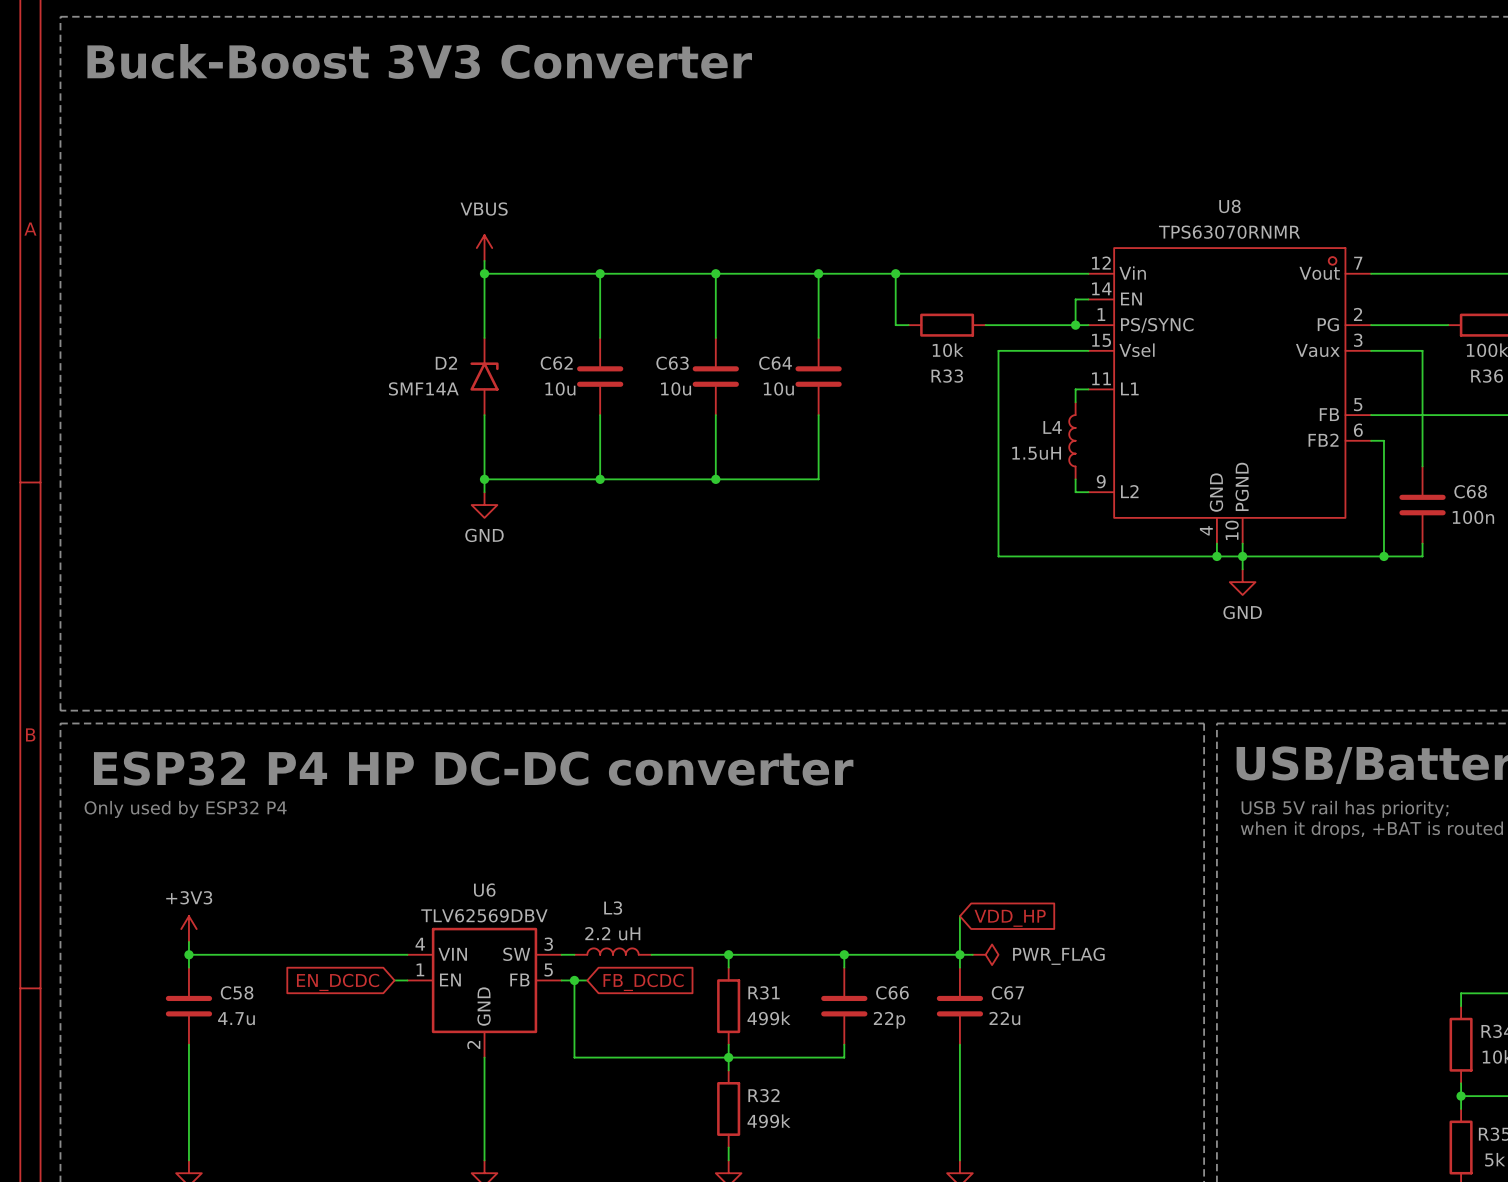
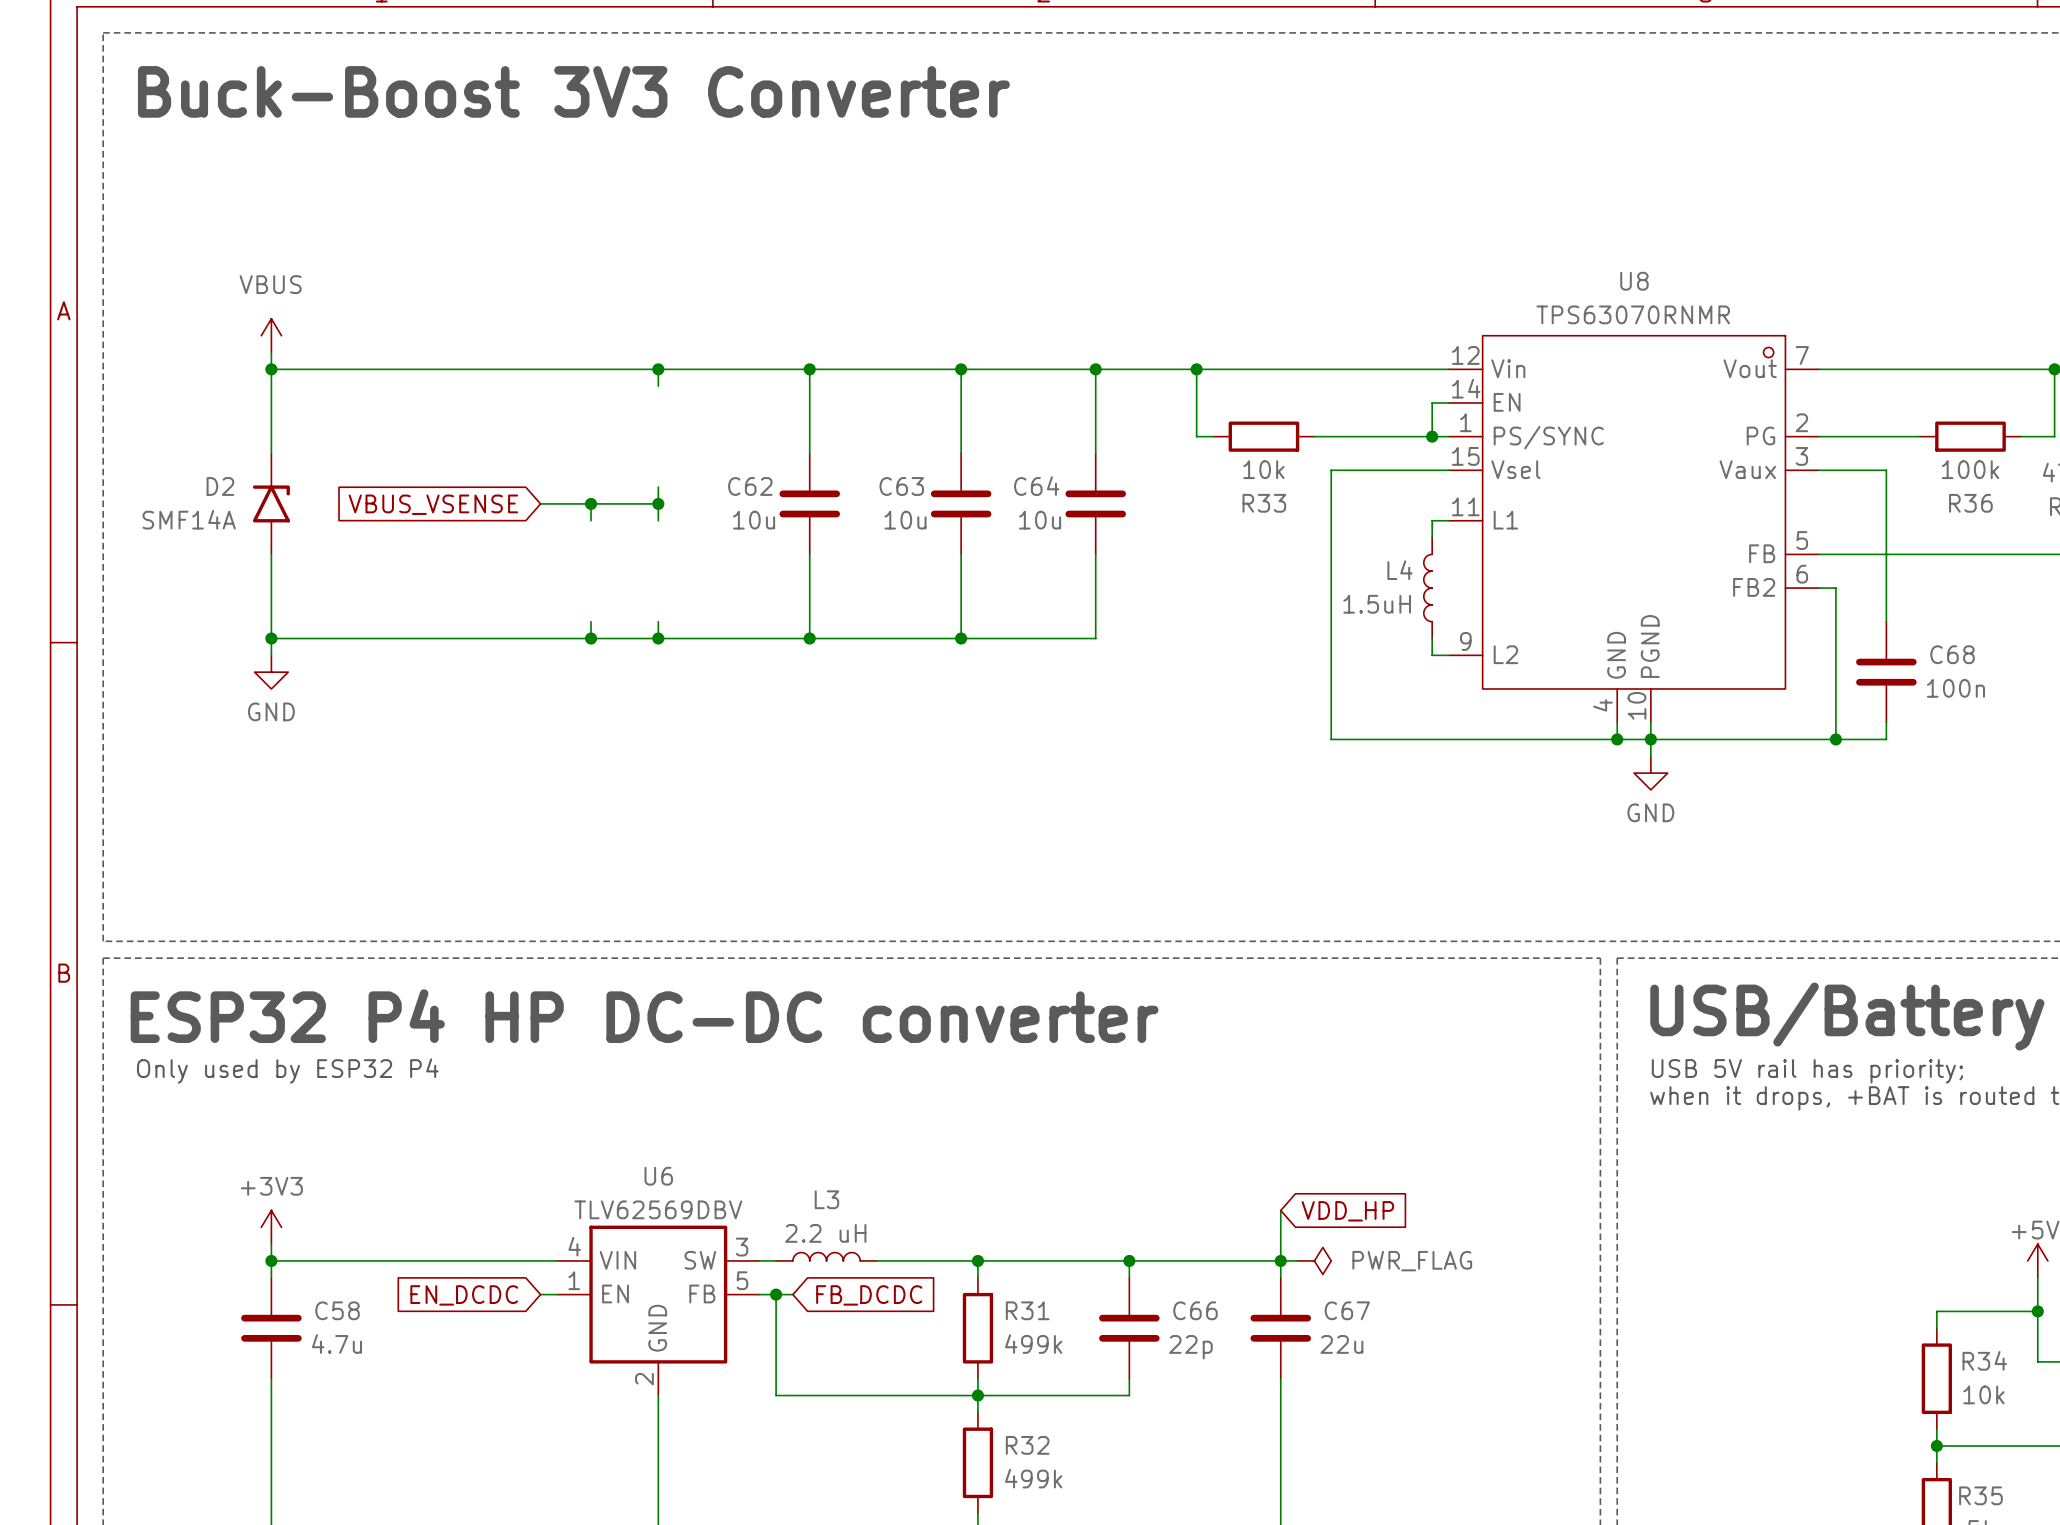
power symbol: none -> VBUS (271, 335)
power symbol: VBUS (484, 248) -> none
wire: none -> (271, 352) (271, 453)
wire: (484, 260) (484, 273) -> (271, 369) (658, 369)
junction: none -> (271, 369)
wire: (484, 286) (484, 338) -> none
wire: none -> (658, 487) (658, 520)
wire: none -> (540, 503) (658, 503)
wire: none -> (591, 503) (591, 520)
junction: none -> (591, 503)
junction: none -> (658, 503)
D2 position: (484, 376) -> (271, 503)
global label: none -> VBUS_VSENSE (433, 504)
wire: none -> (271, 554) (271, 655)
wire: (484, 415) (484, 466) -> none
wire: none -> (591, 621) (591, 638)
junction: none -> (271, 638)
junction: none -> (591, 638)
wire: (484, 479) (484, 492) -> (658, 638) (271, 638)
power symbol: none -> GND (271, 672)
power symbol: GND (484, 505) -> none

